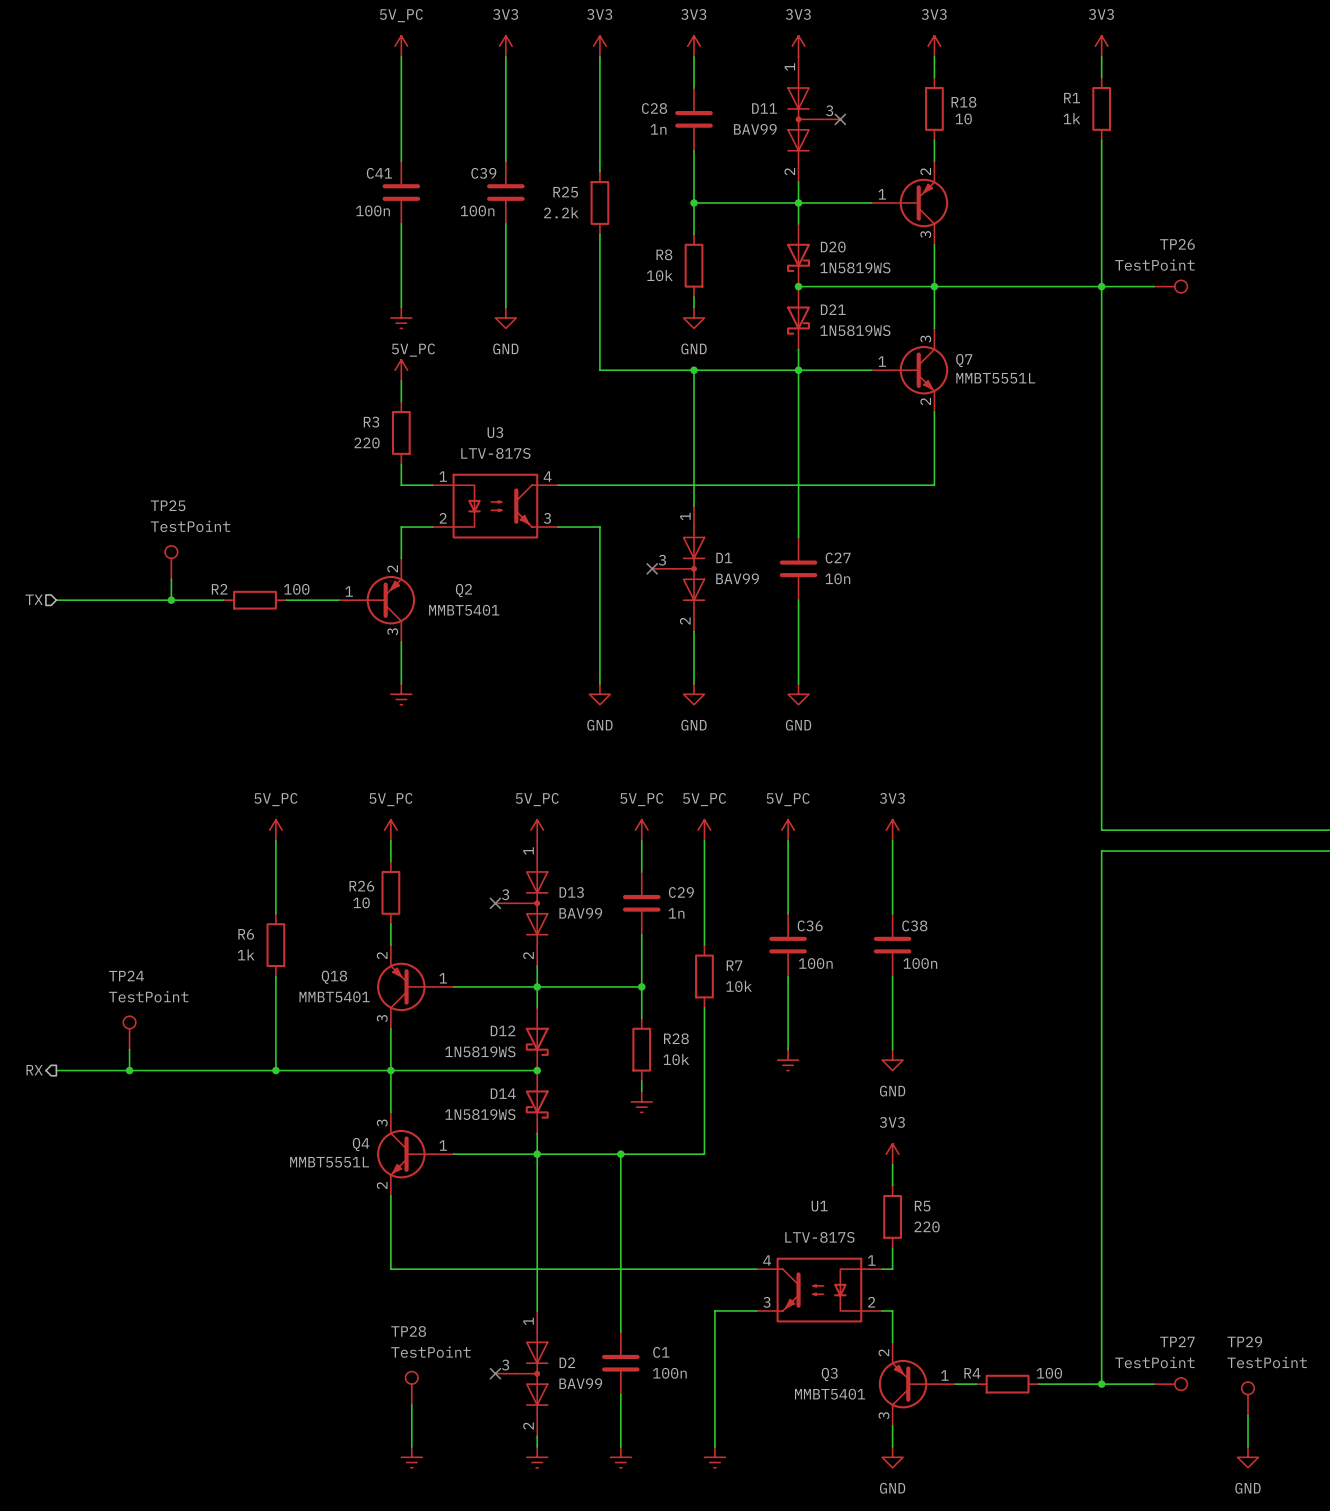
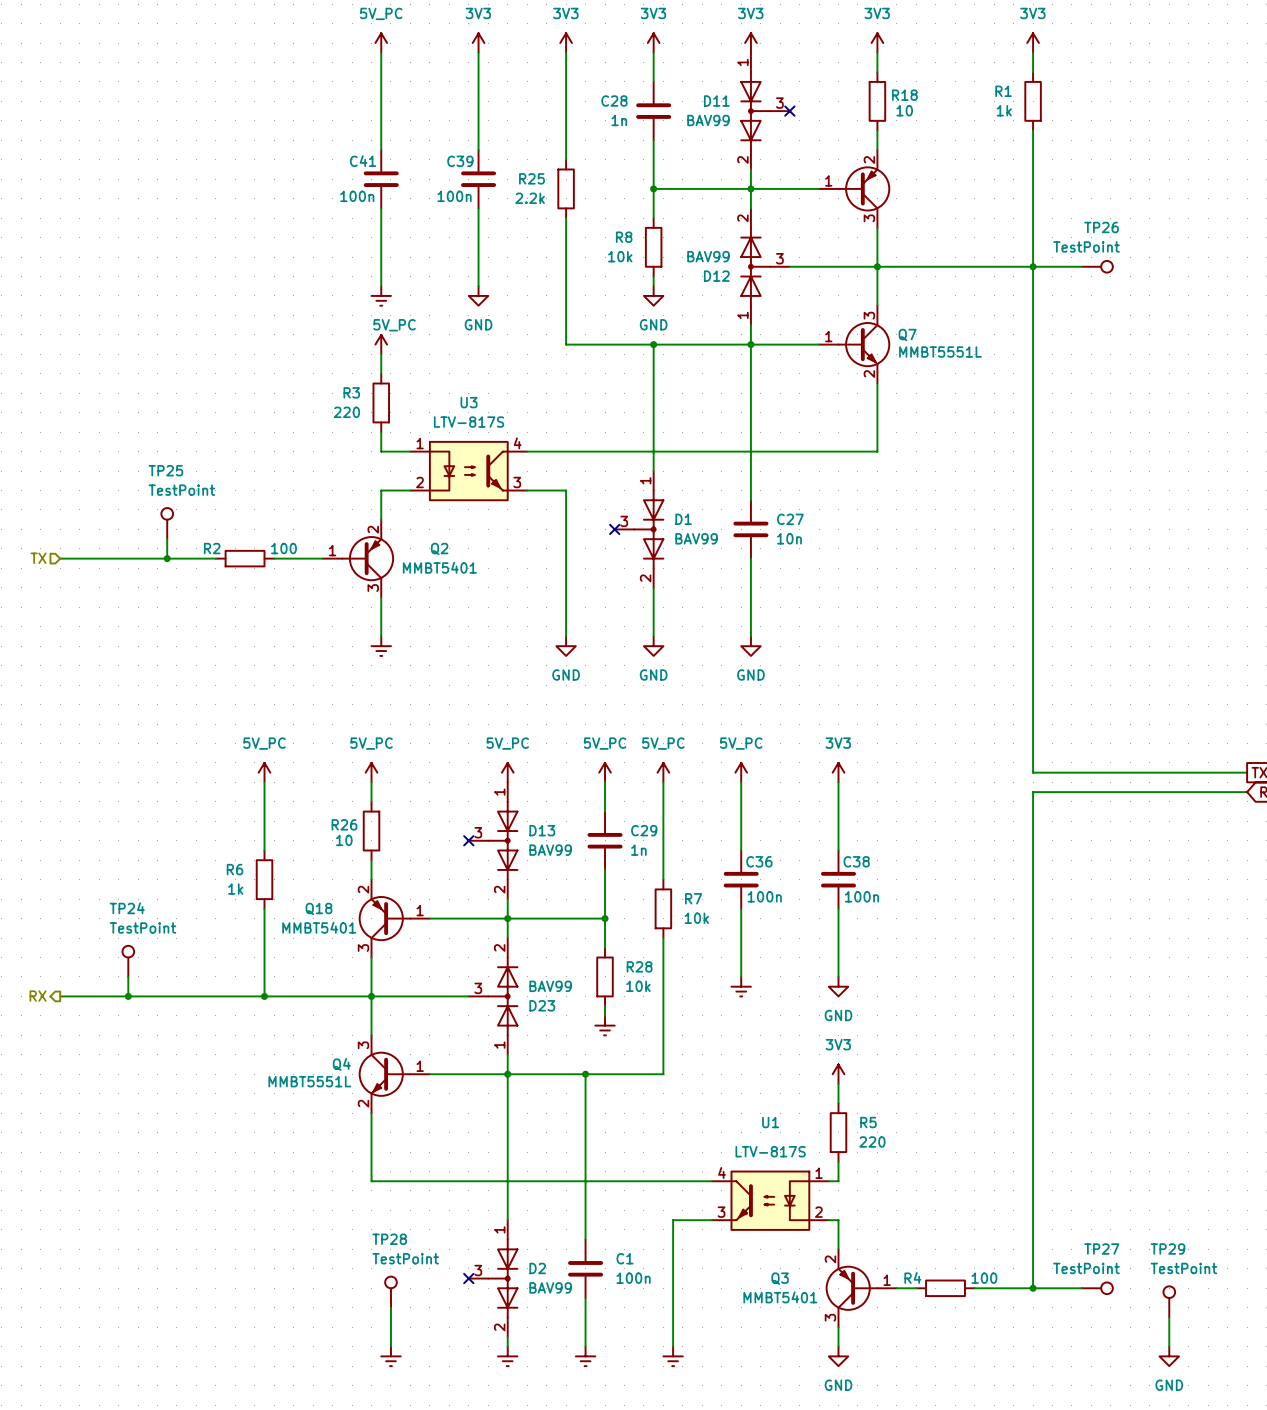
D20: 1N5819WS (798, 255) -> none
junction: (798, 286) -> none
D21: 1N5819WS (798, 317) -> none
D12 symbol: [525, 1007, 549, 1071] -> [740, 208, 790, 326]
D12 name position: D12 (503, 1030) -> D12 (716, 276)
D12 value: 1N5819WS (480, 1051) -> BAV99 (708, 256)
D23: none -> BAV99 (493, 996)
junction: (537, 1070) -> none
D14: 1N5819WS (537, 1101) -> none

